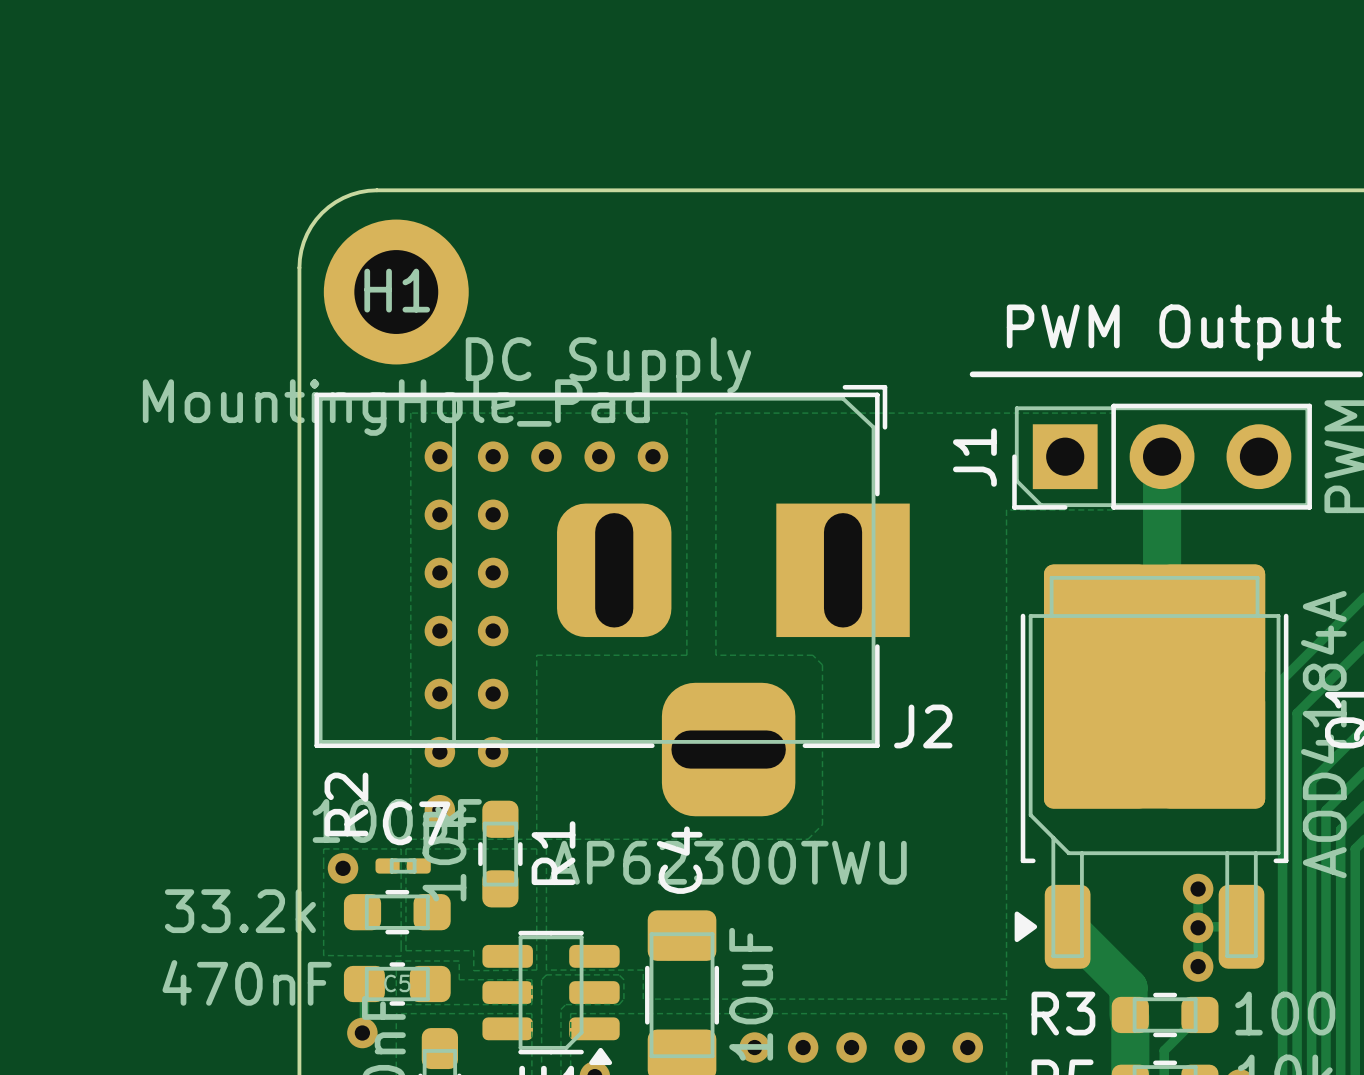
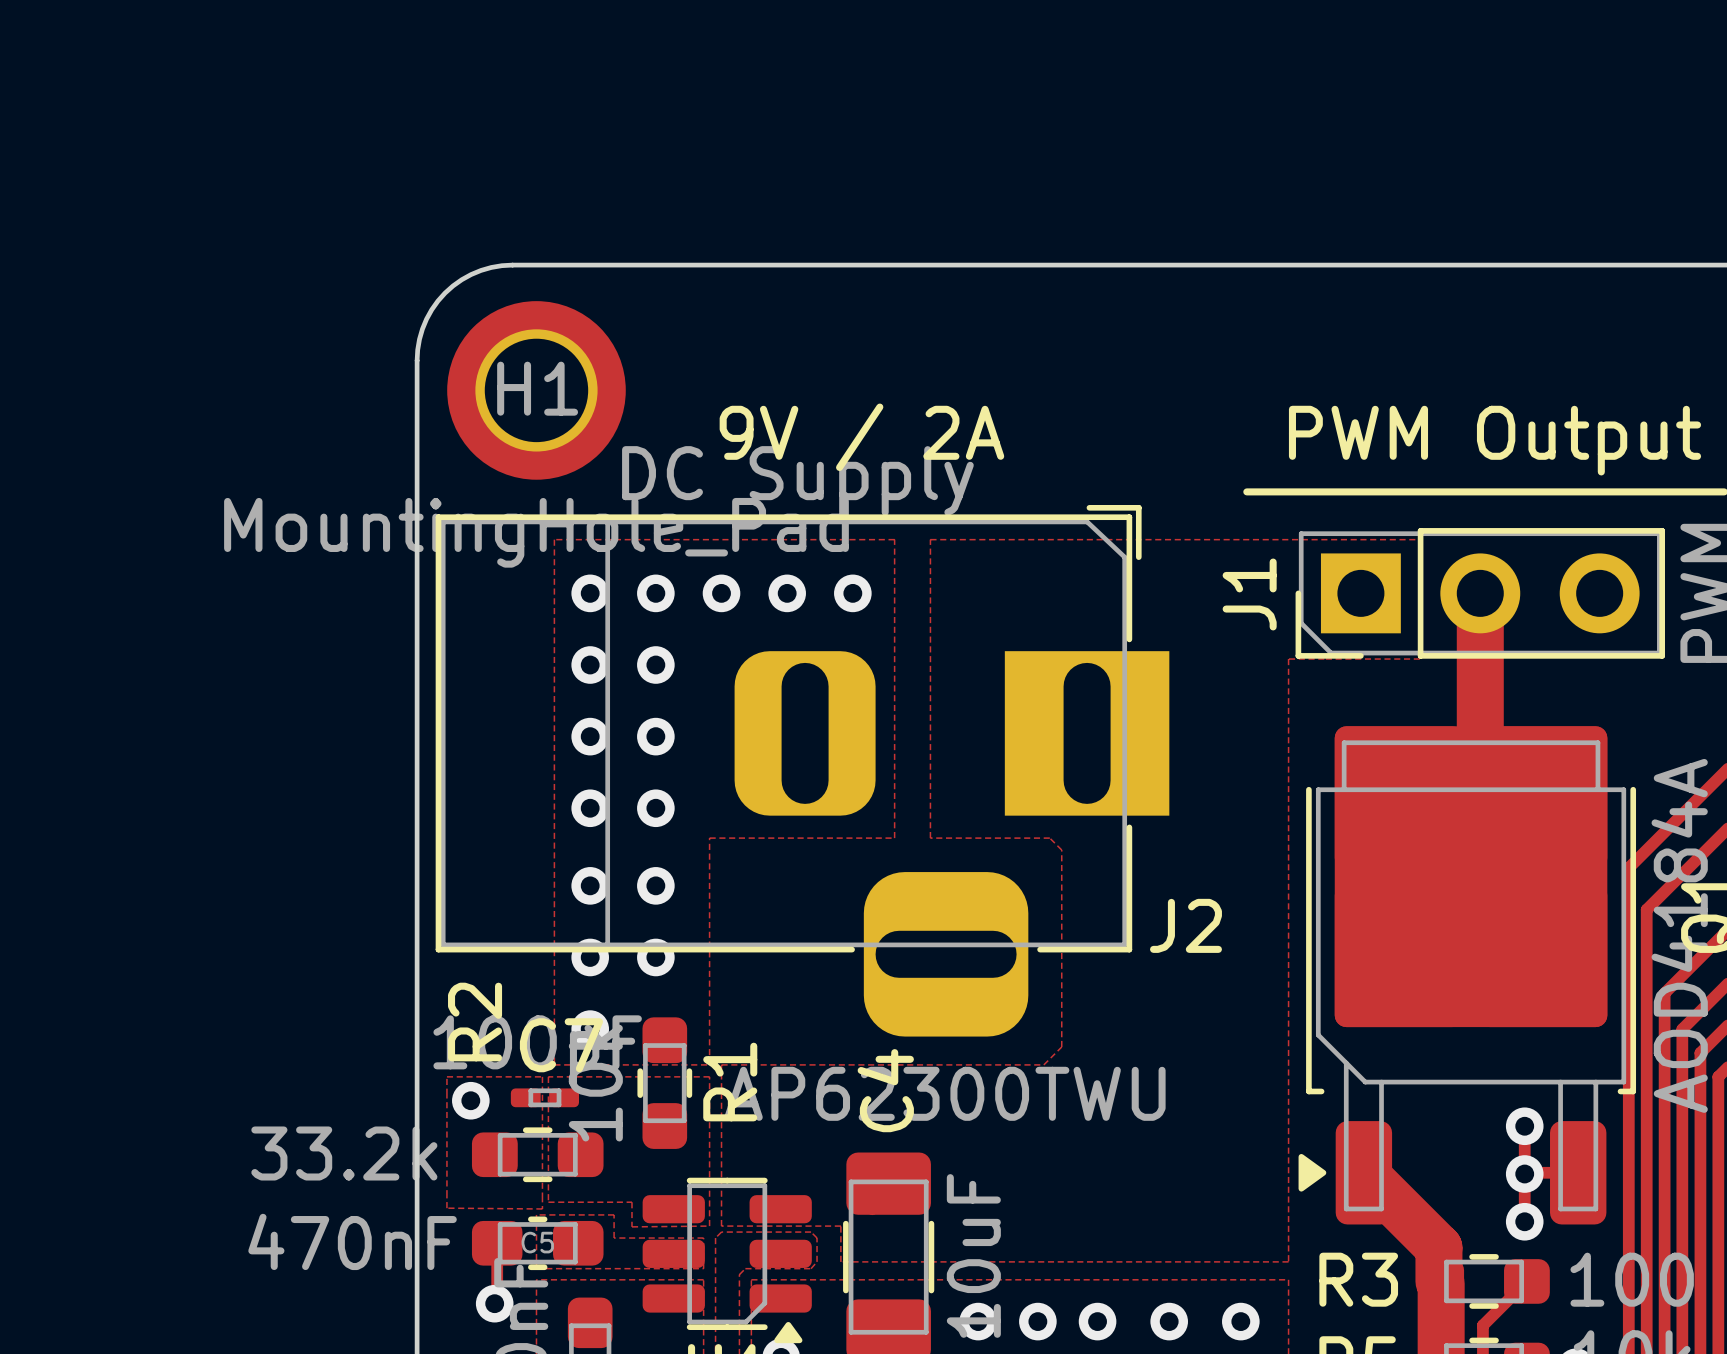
text: none -> 9V / 2A (861, 437)

